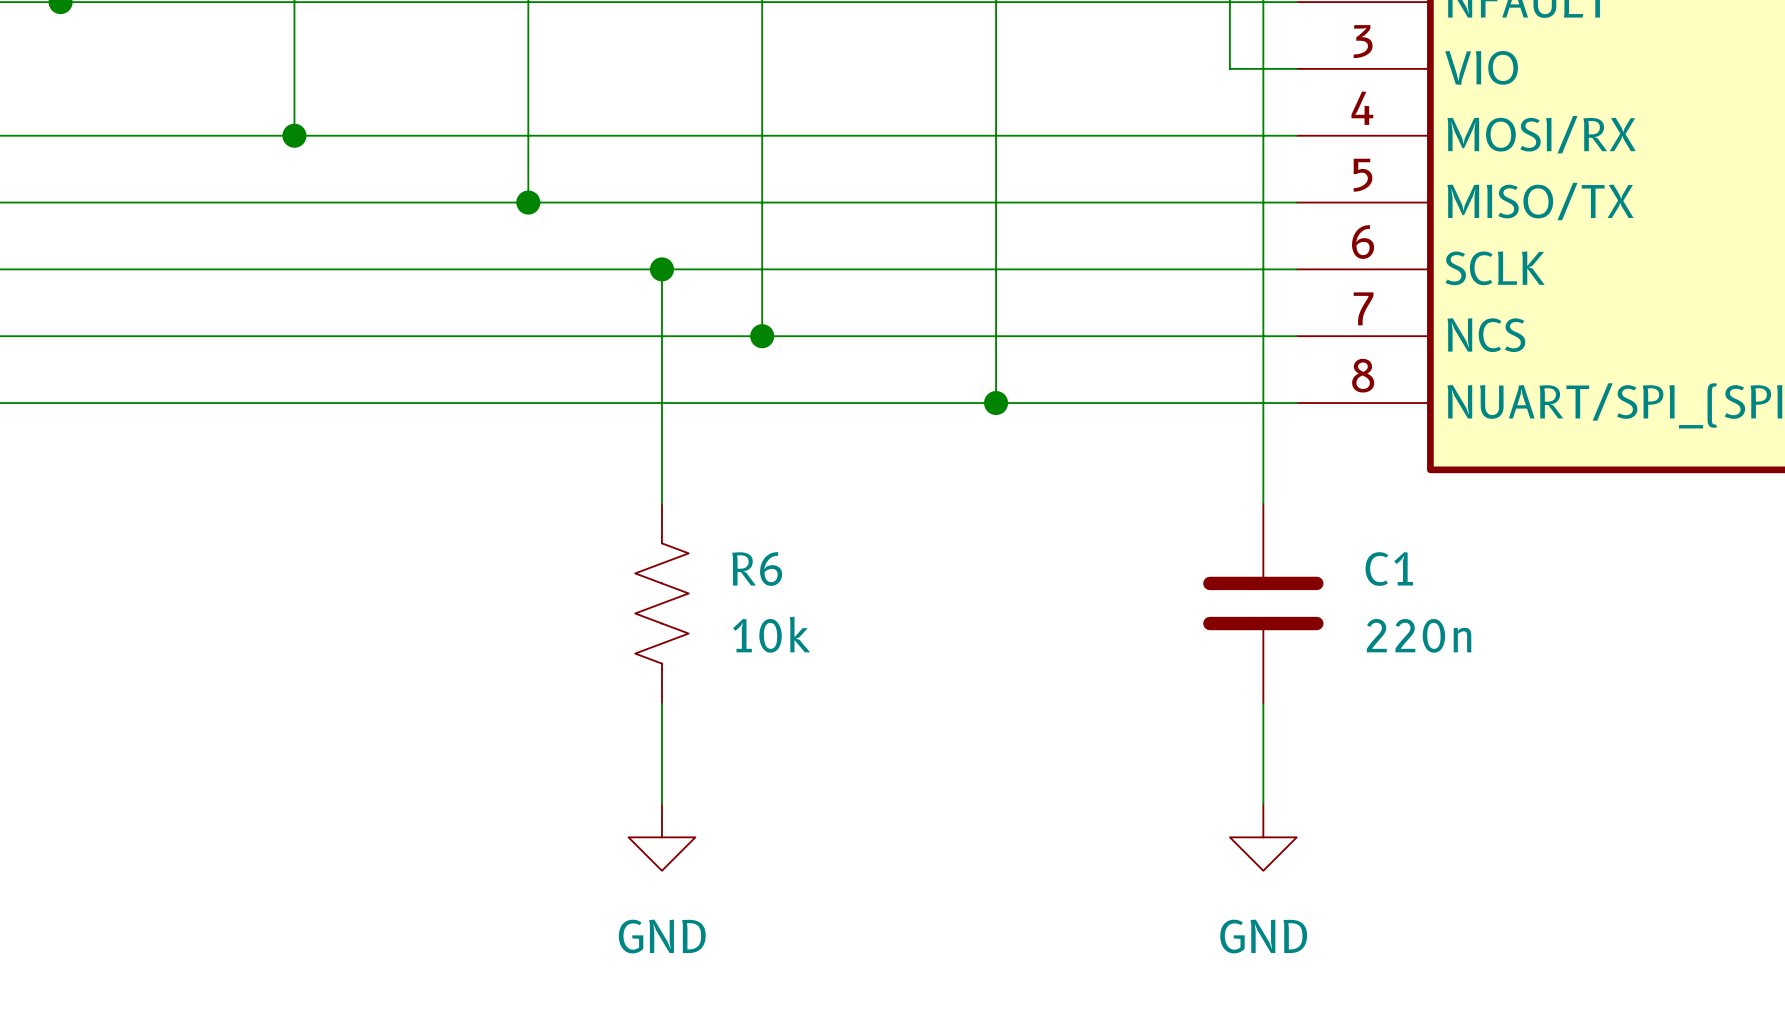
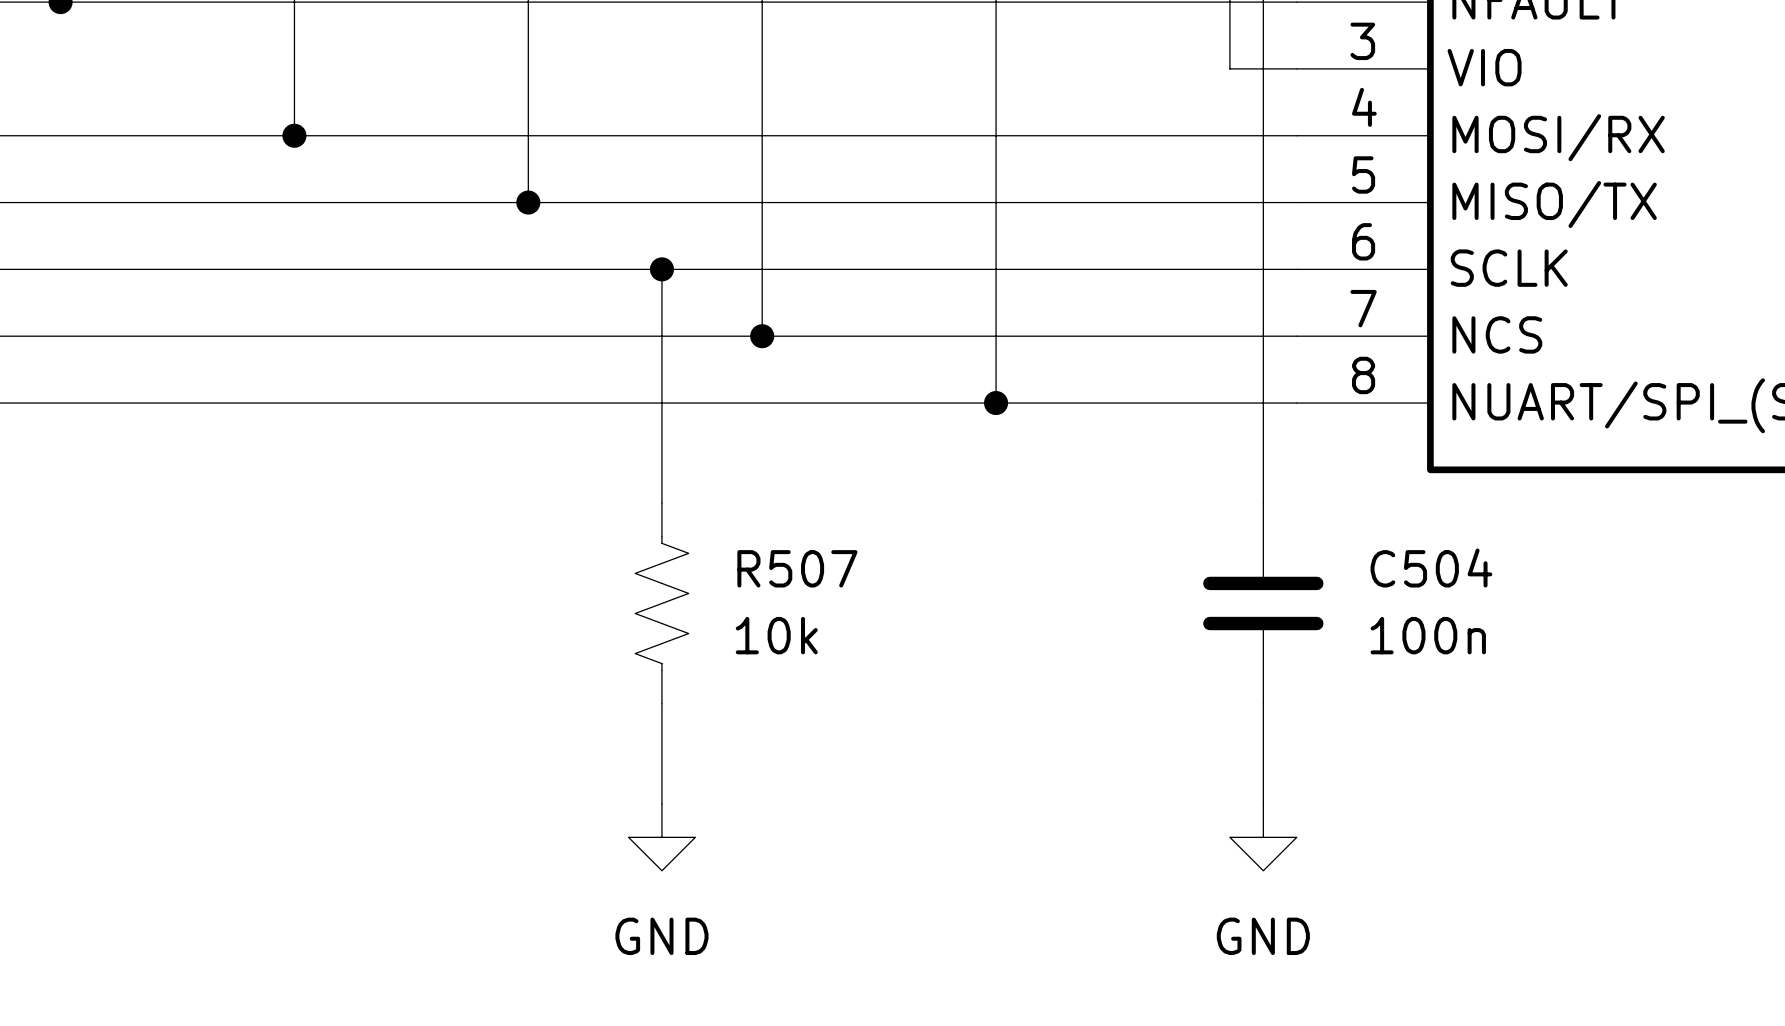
R6 name: R6 (757, 569) -> R507 (797, 568)
C1 name: C1 (1389, 569) -> C504 (1431, 568)
C1 value: 220n (1419, 635) -> 100n (1428, 635)

